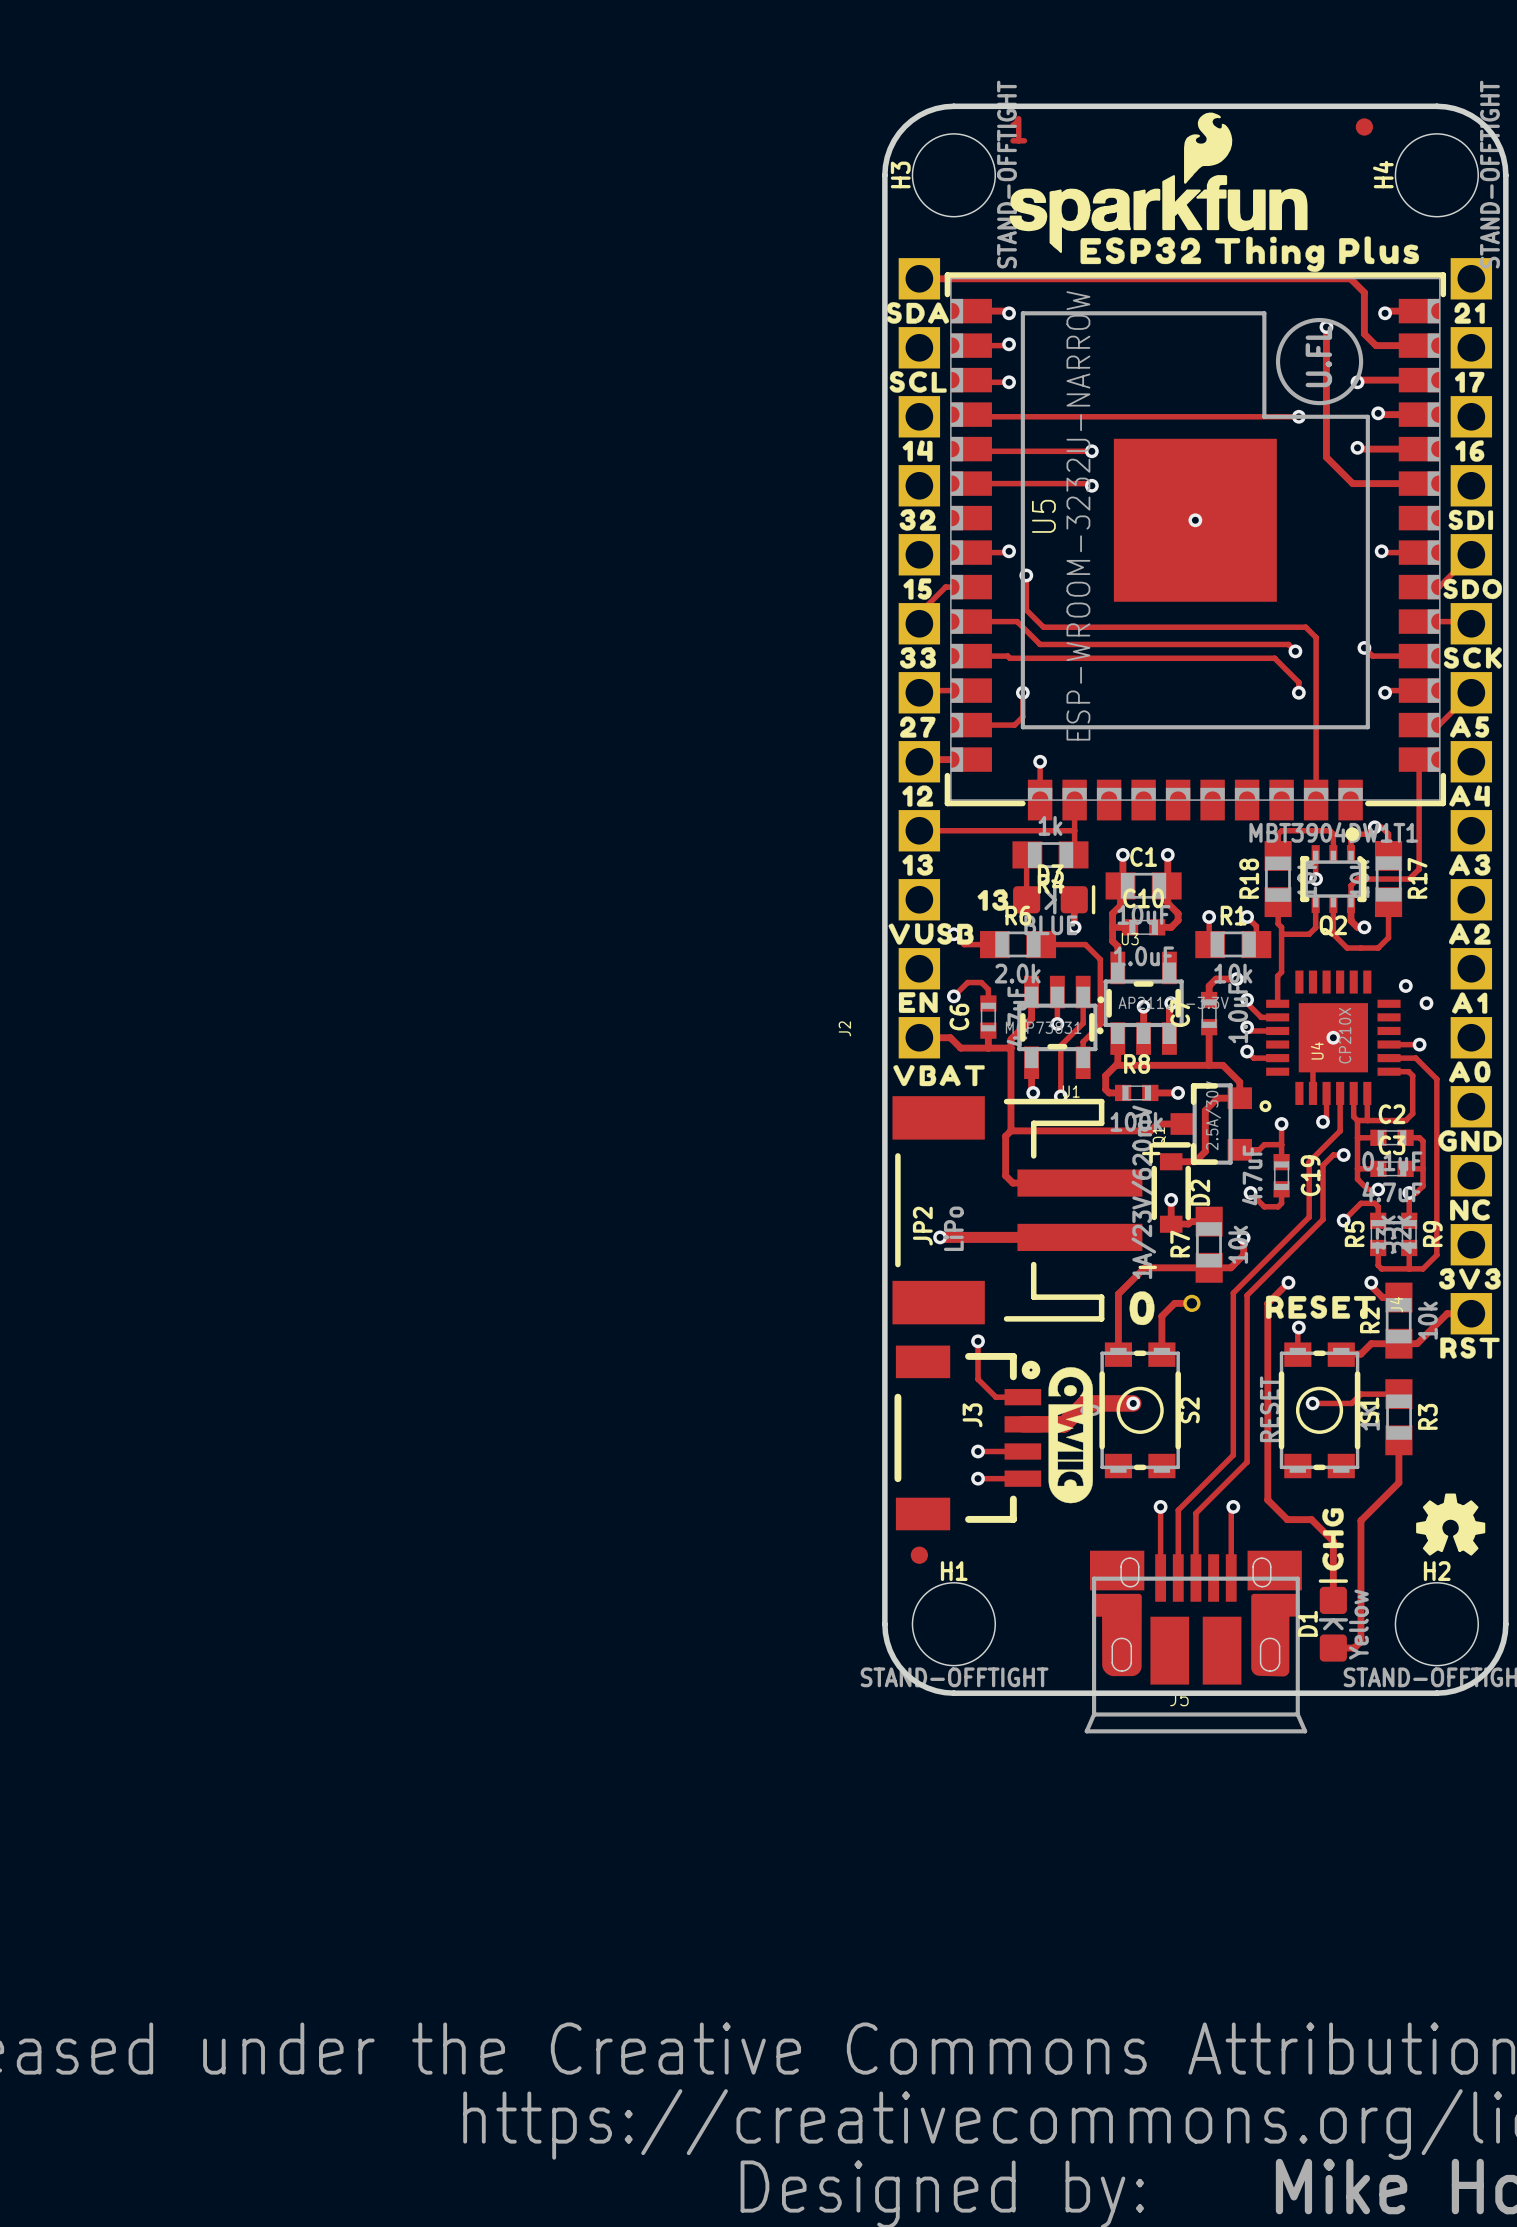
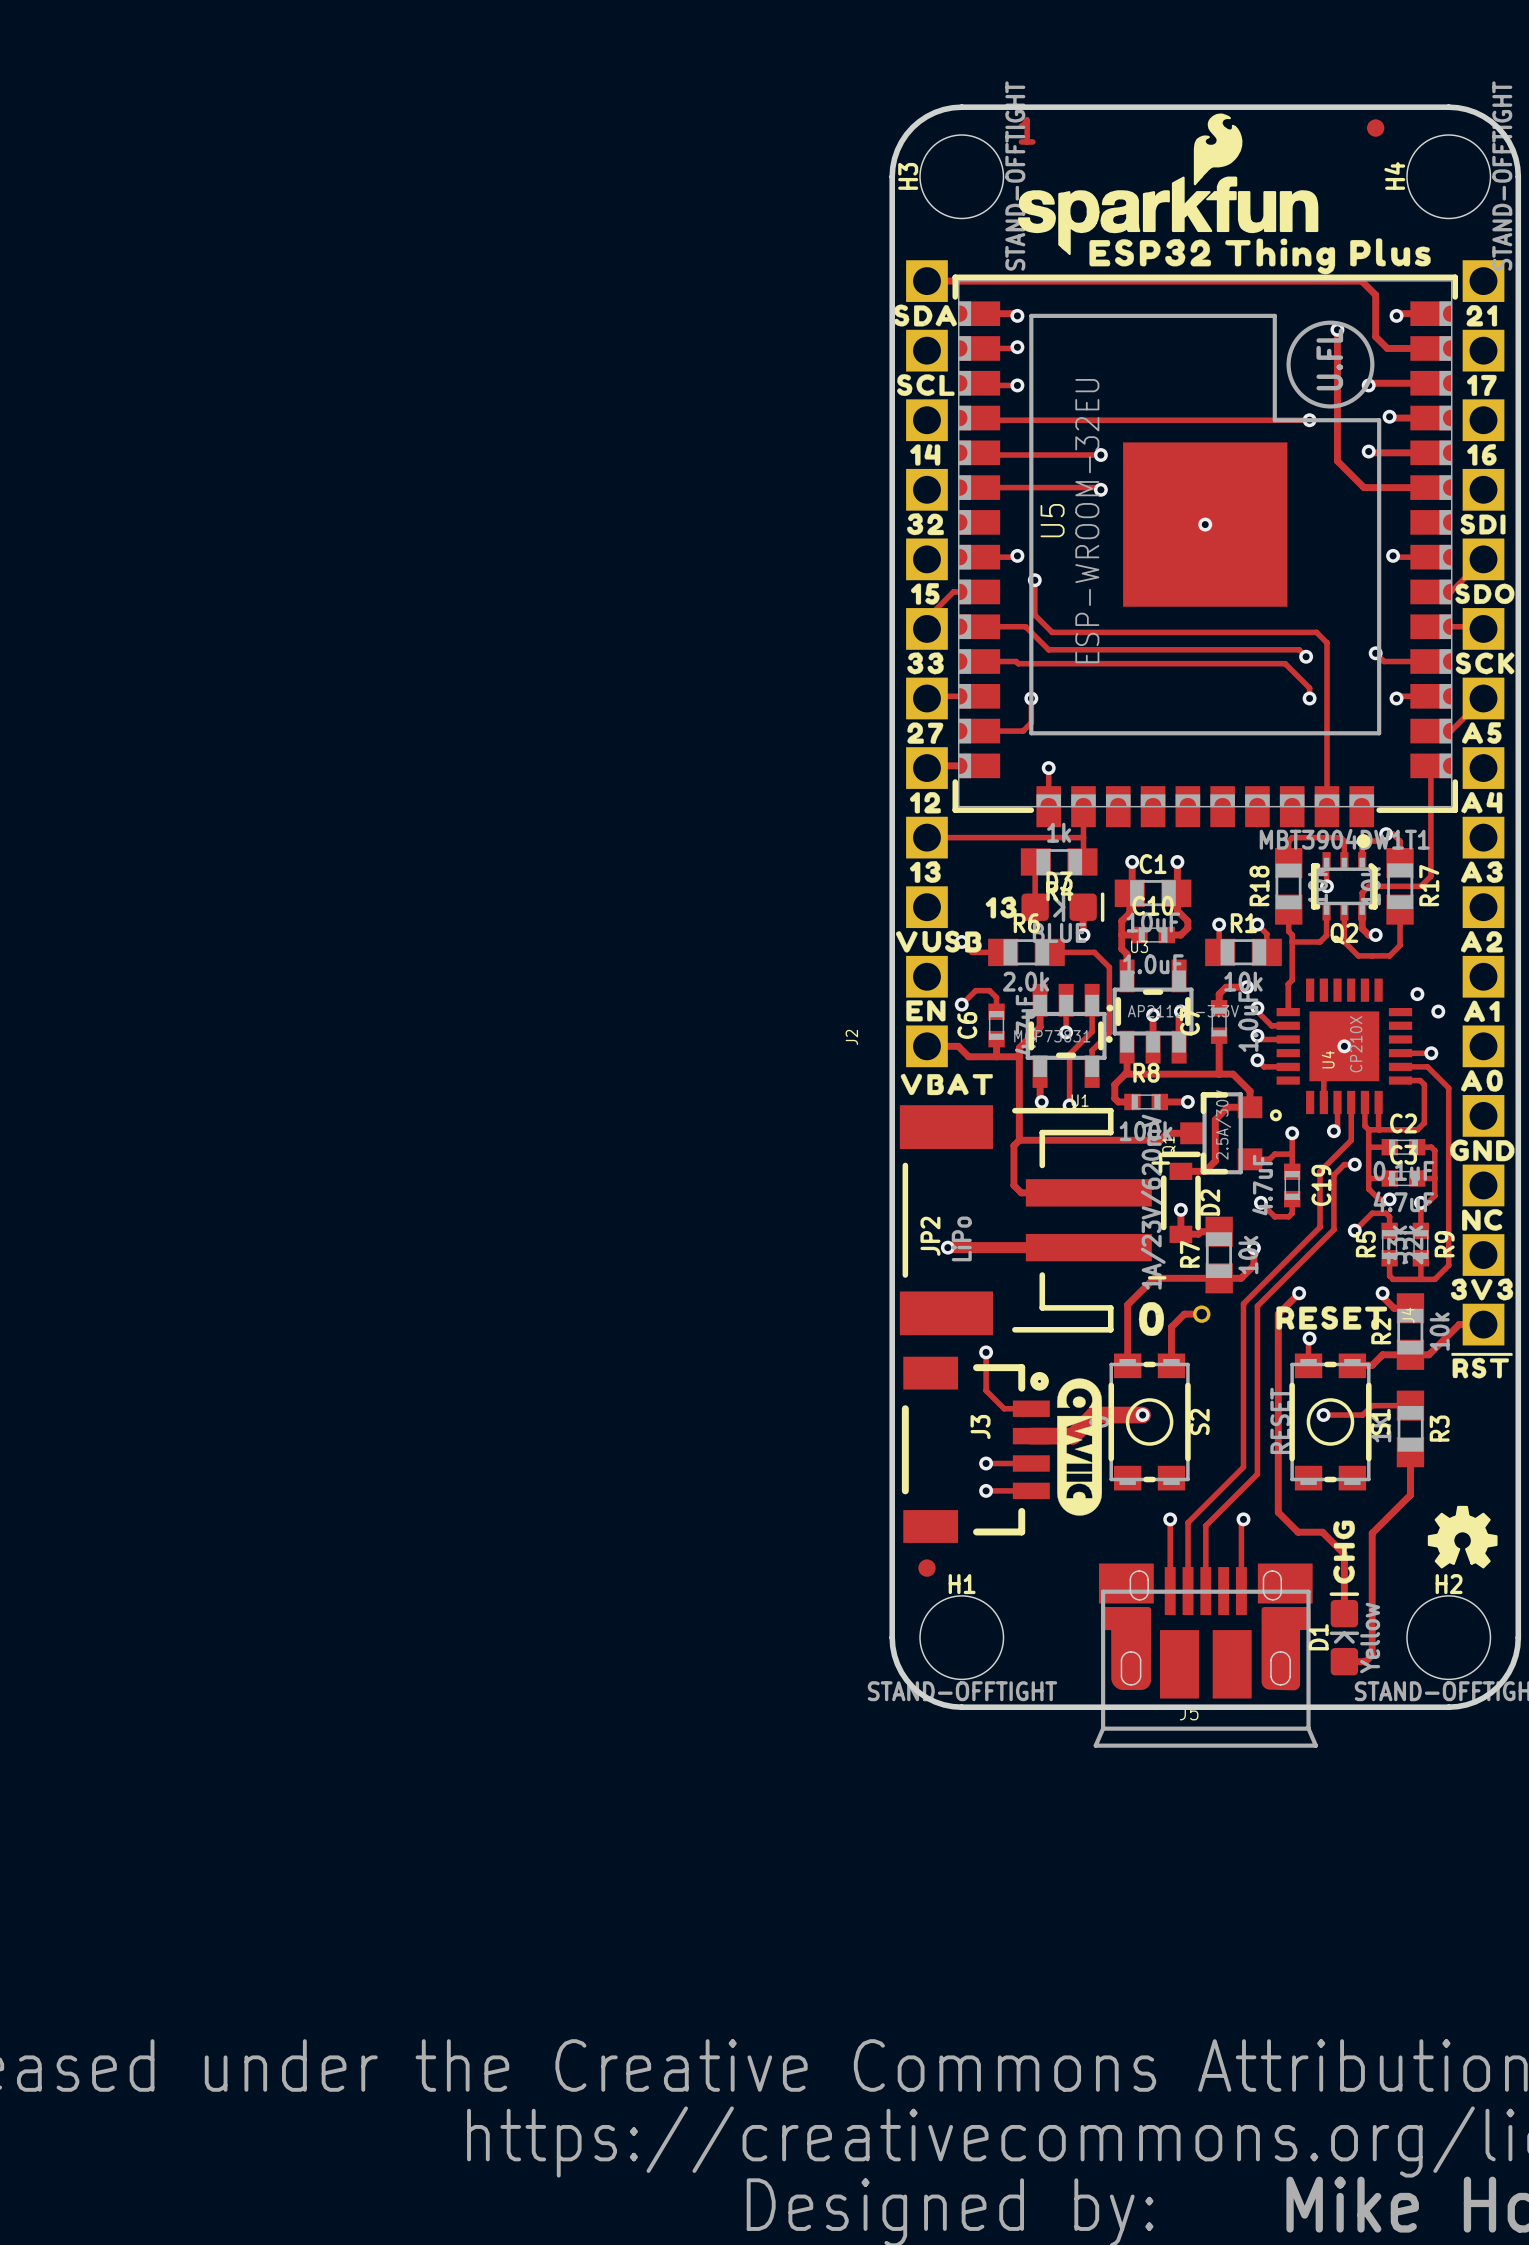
U5 value: ESP-WROOM-3232U-NARROW (1078, 515) -> ESP-WROOM-32EU (1087, 521)
drawing shape: [1440, 1336, 1500, 1359] -> [1451, 1352, 1513, 1379]

